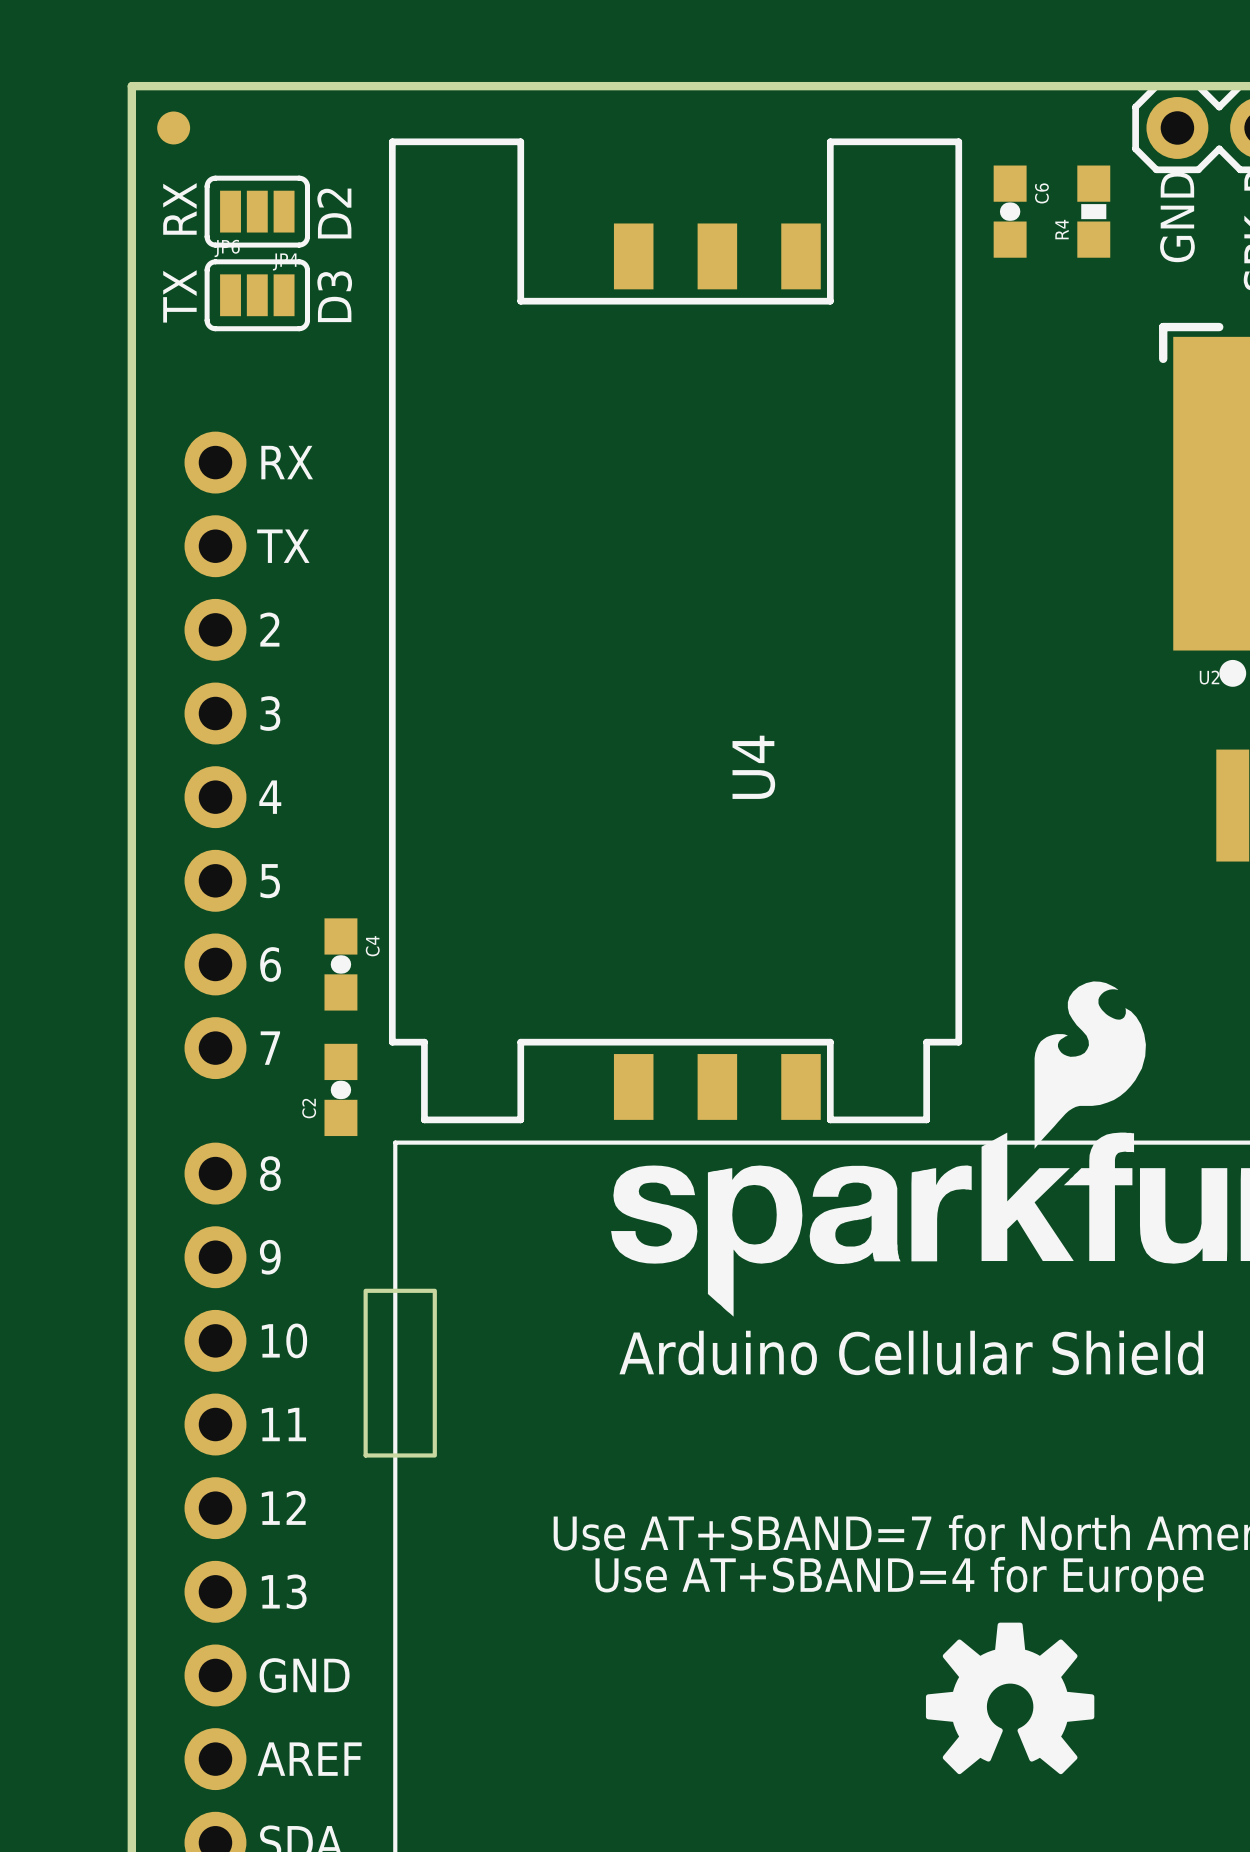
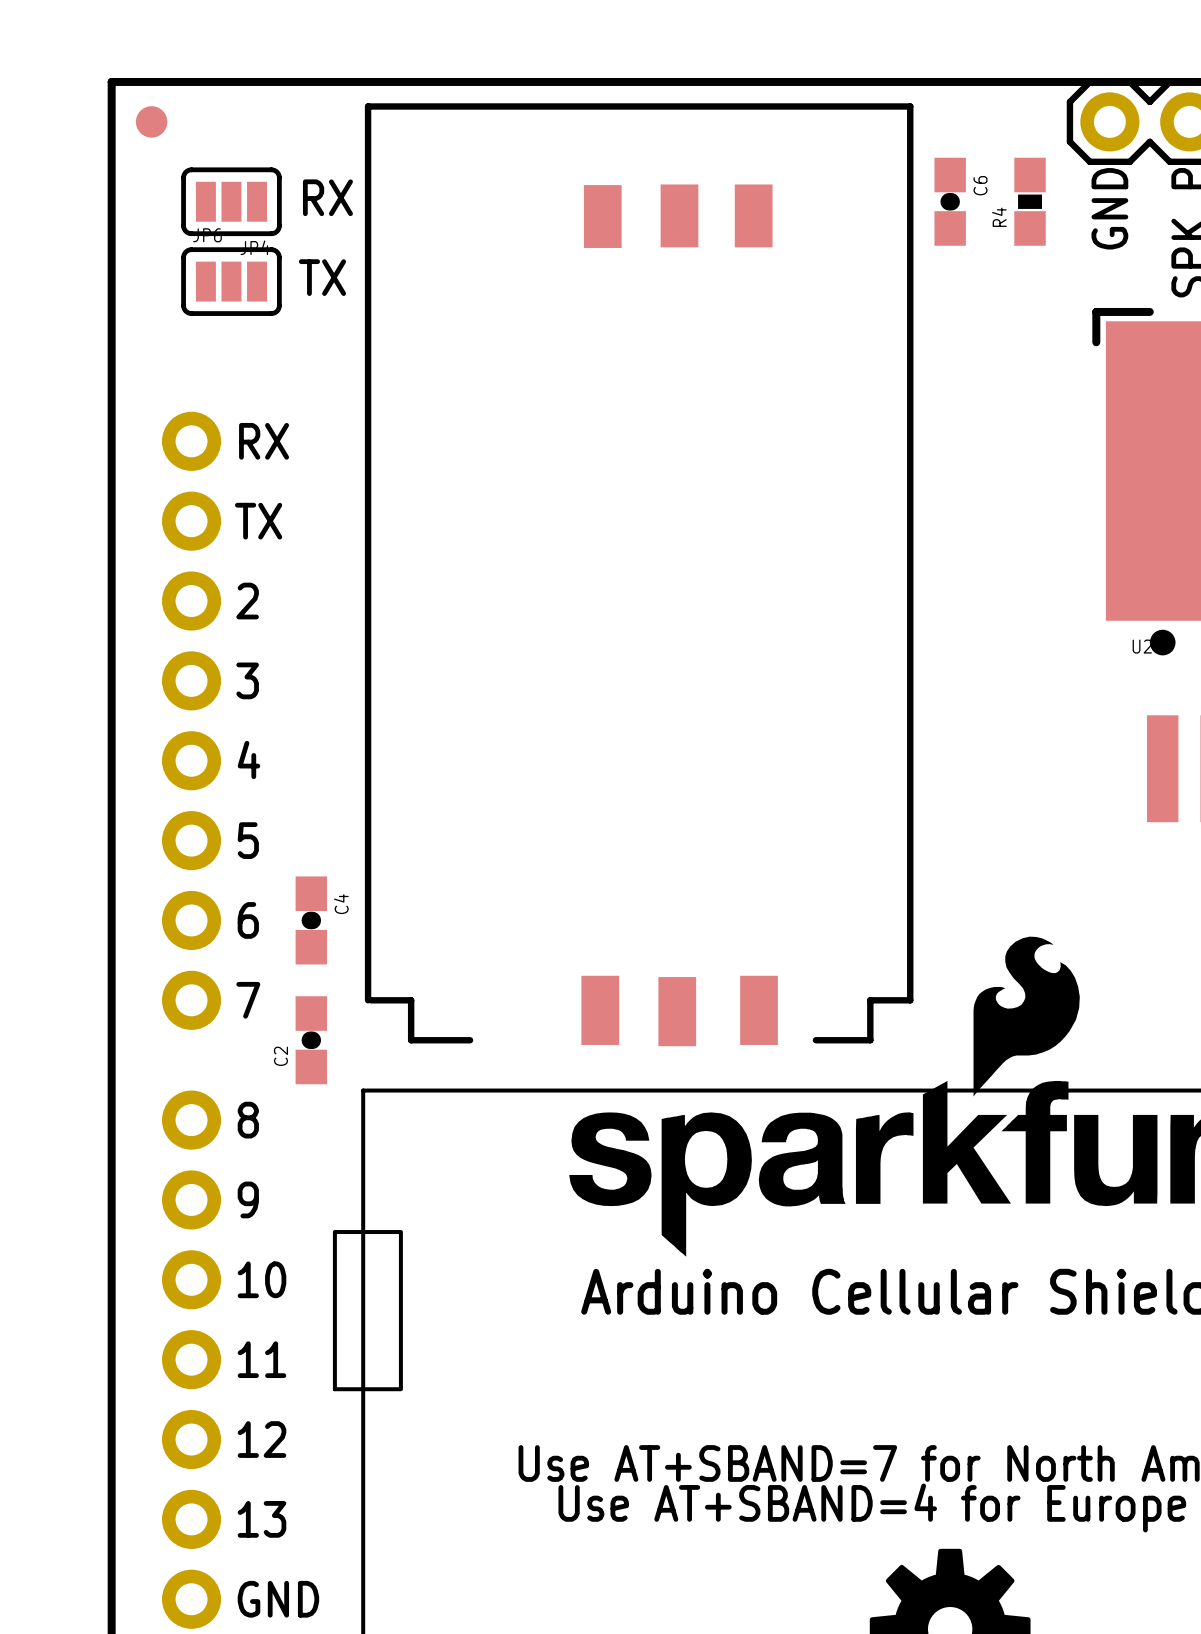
text rotation: 0° (179, 208) -> 90° clockwise (327, 197)
text position: RX (179, 208) -> RX (327, 197)
text: D2 (334, 213) -> none
text rotation: 0° (179, 296) -> 90° clockwise (322, 277)
text position: TX (179, 296) -> TX (322, 277)
text: D3 (334, 296) -> none
part: none -> (639, 574)
U4: (675, 630) -> none

